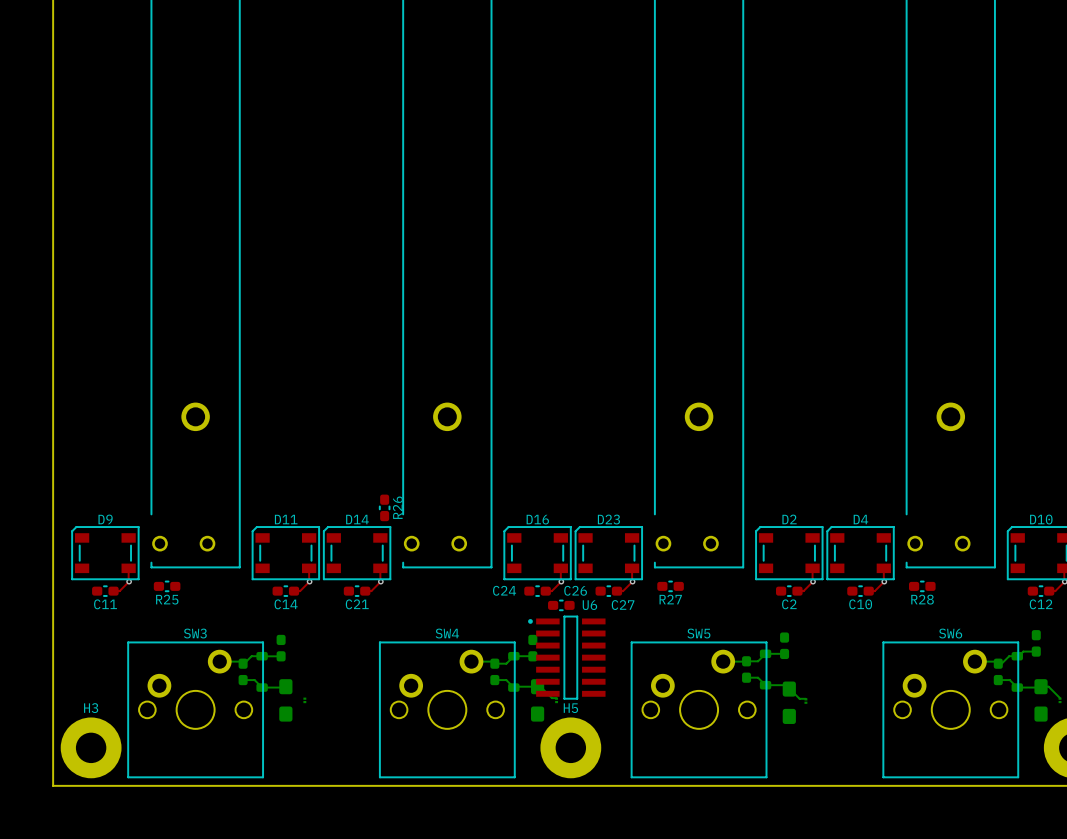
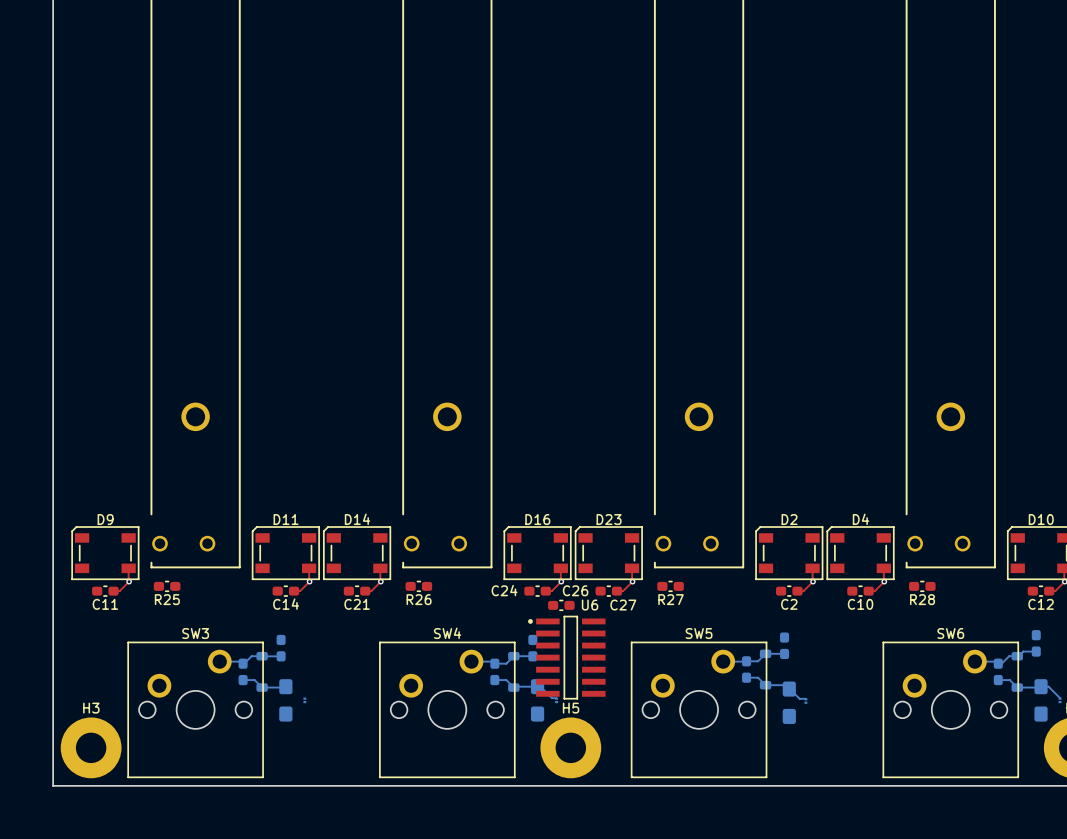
R26 rotation: 0° (384, 507) -> 90° clockwise (418, 586)
R26 position: (384, 507) -> (418, 586)

